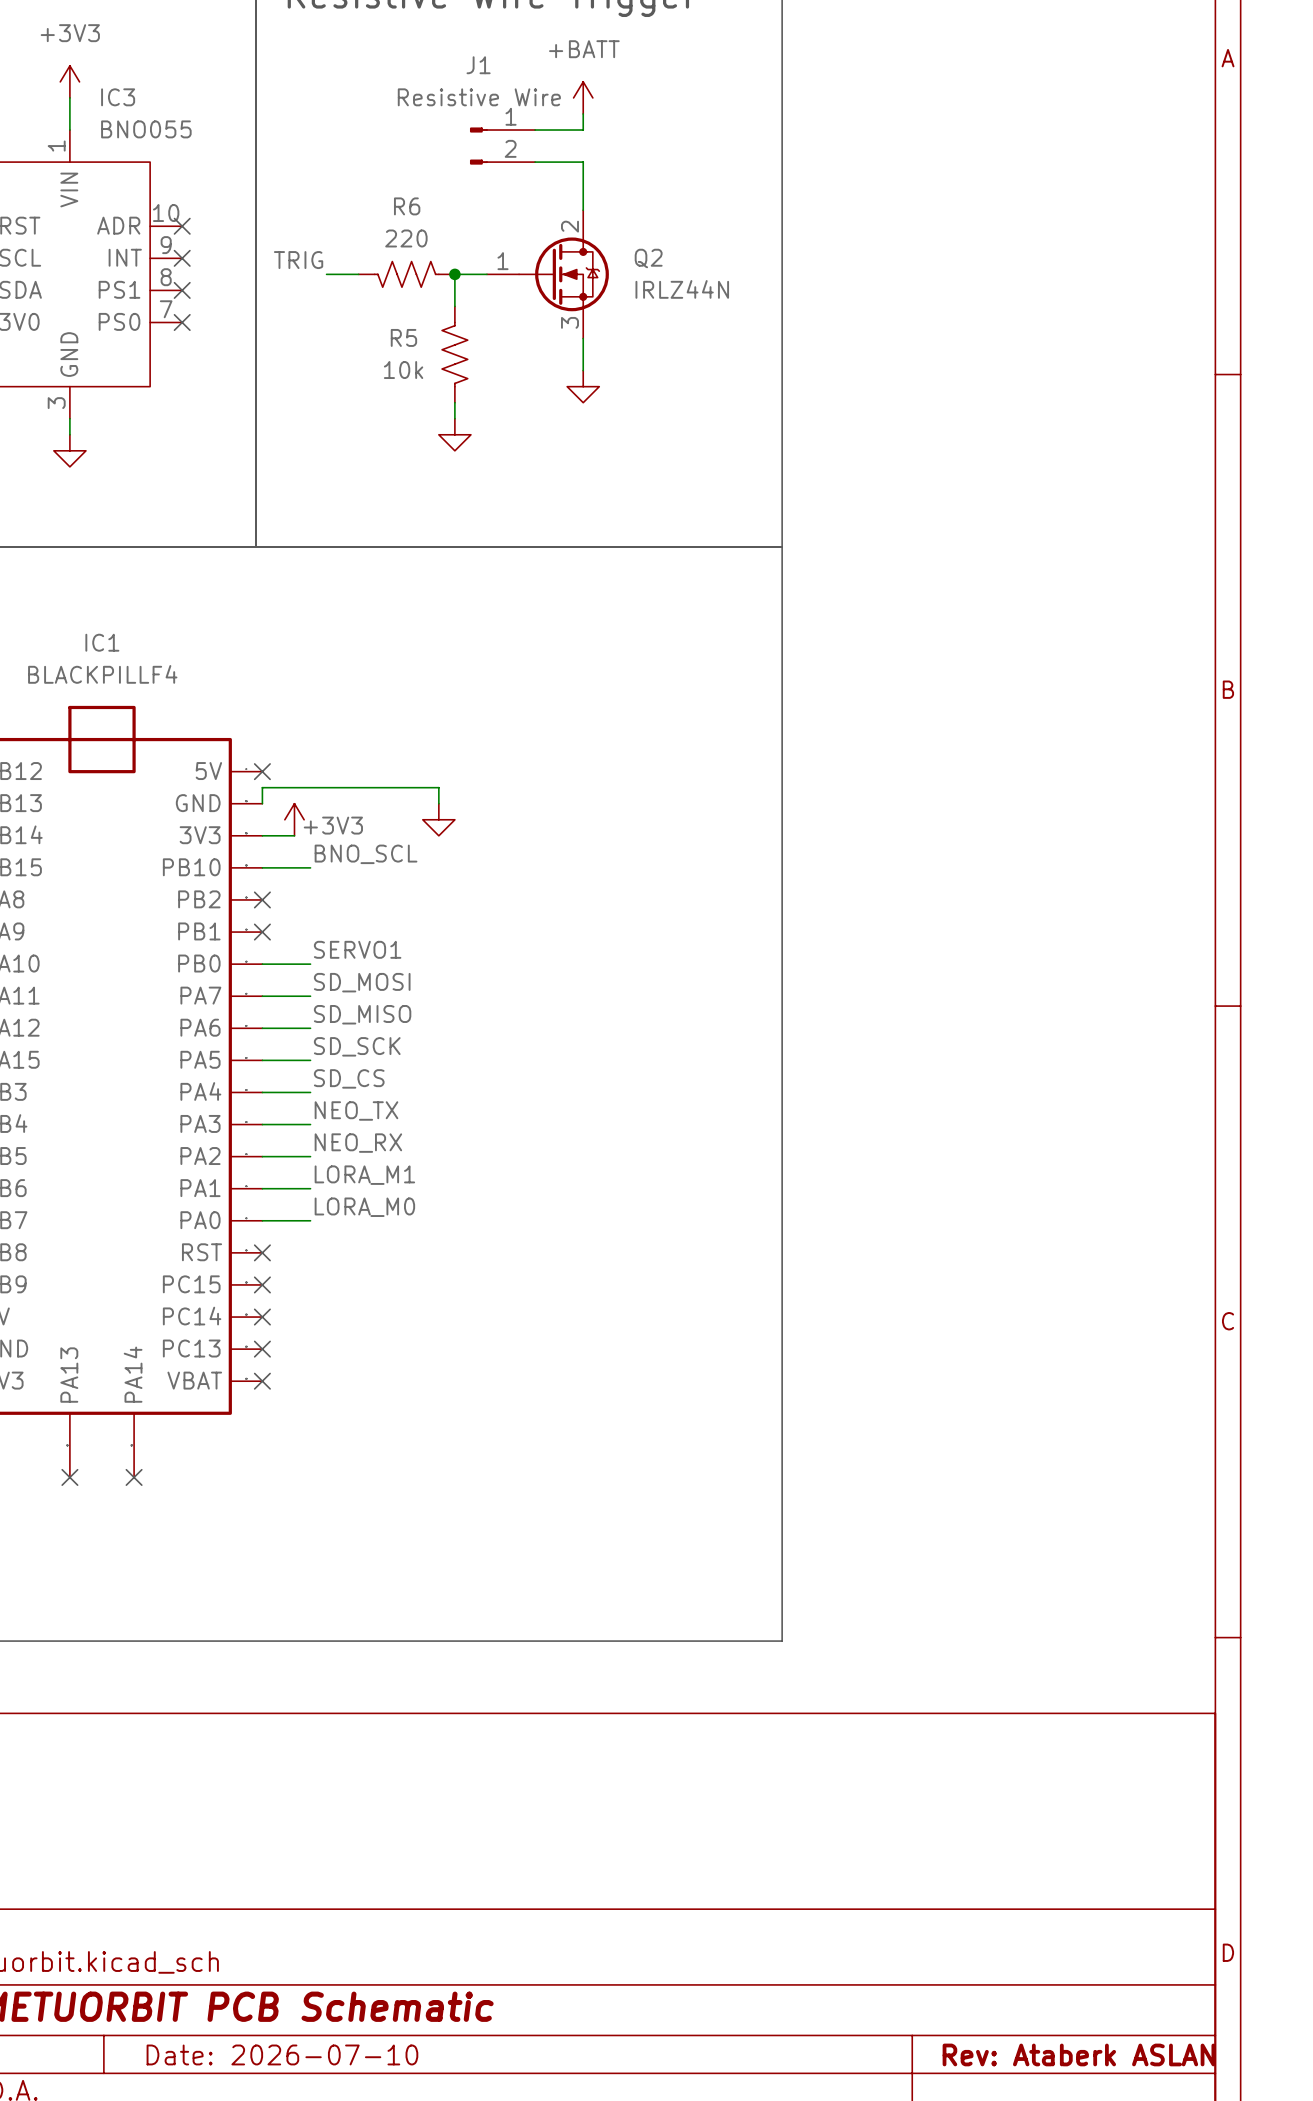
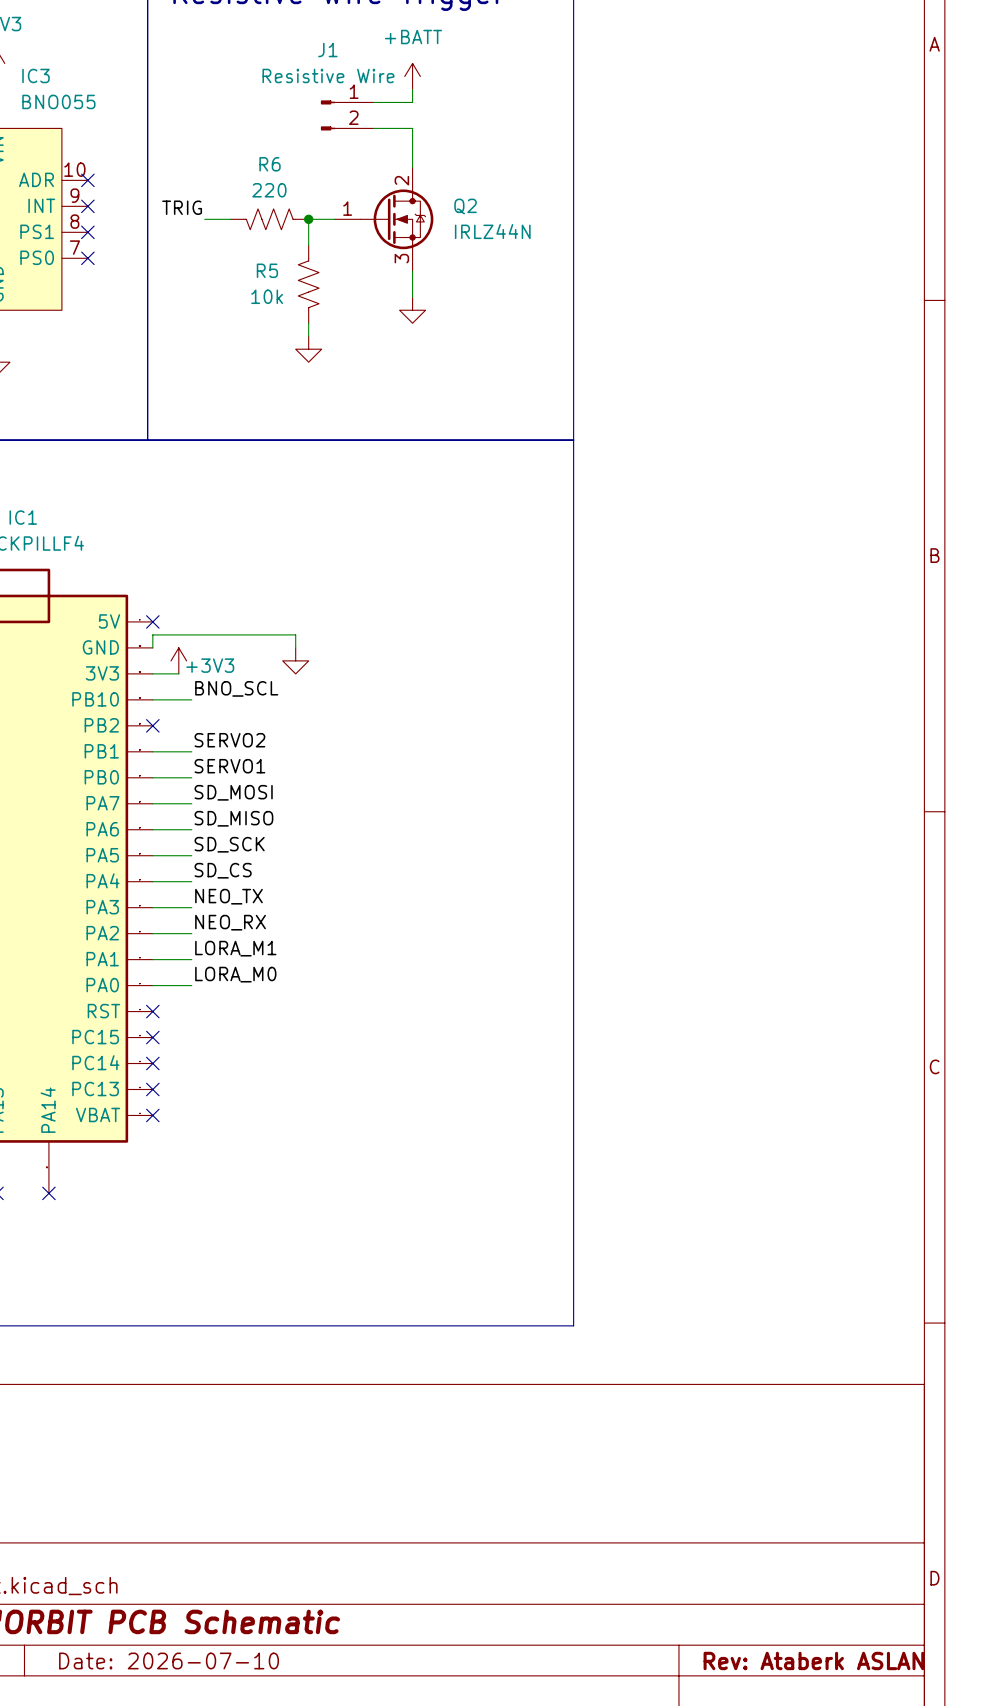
label: none -> SERVO2 (229, 740)
wire: none -> (152, 751) (191, 751)
no-connect mark: (262, 932) -> none

